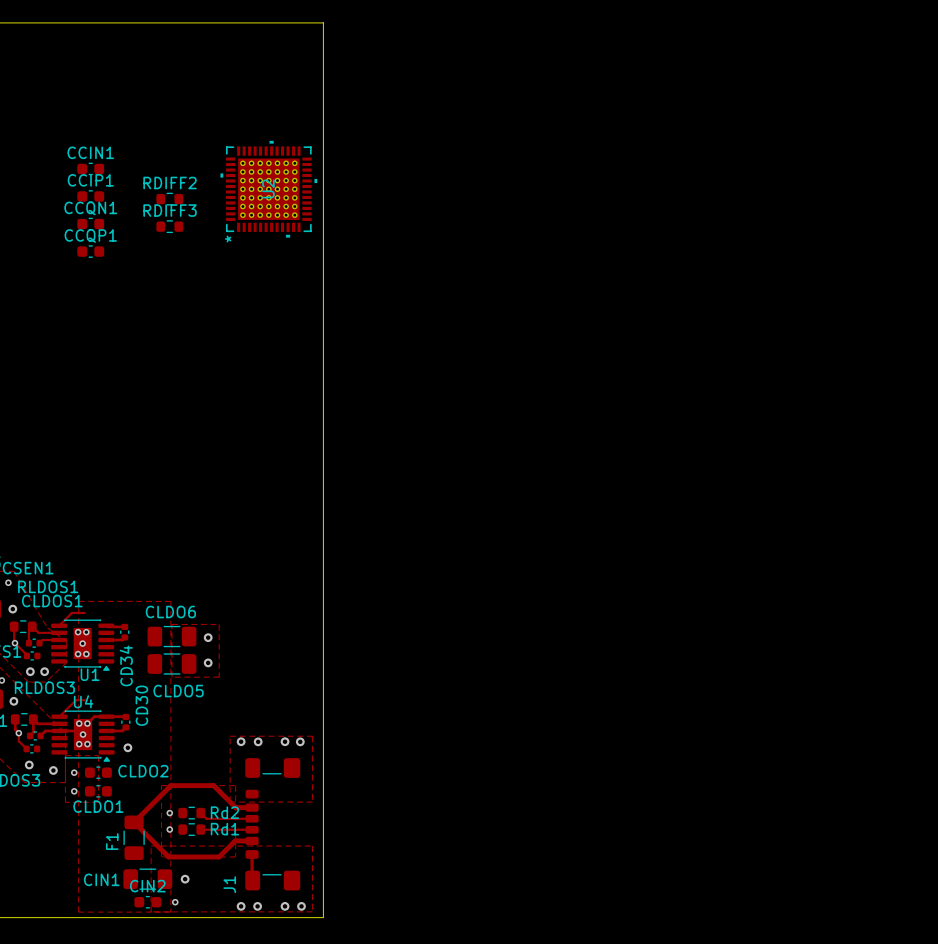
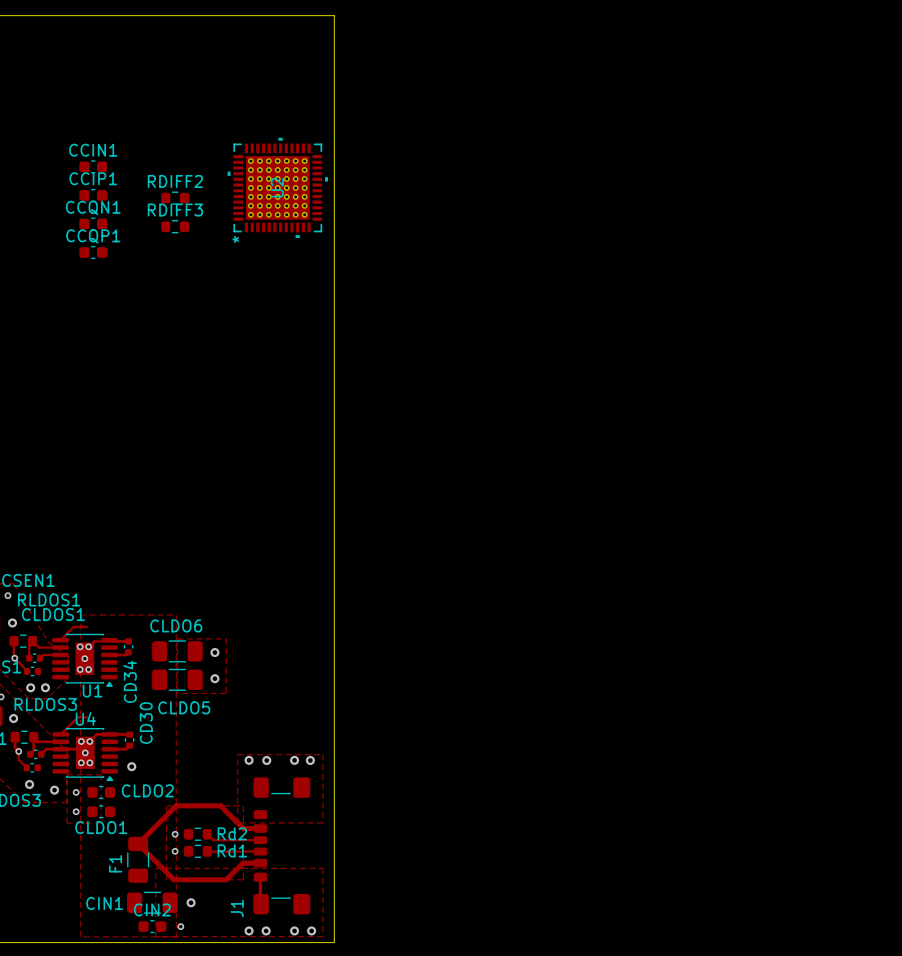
top track: none -> (110, 641) (94, 641) (88, 646)

